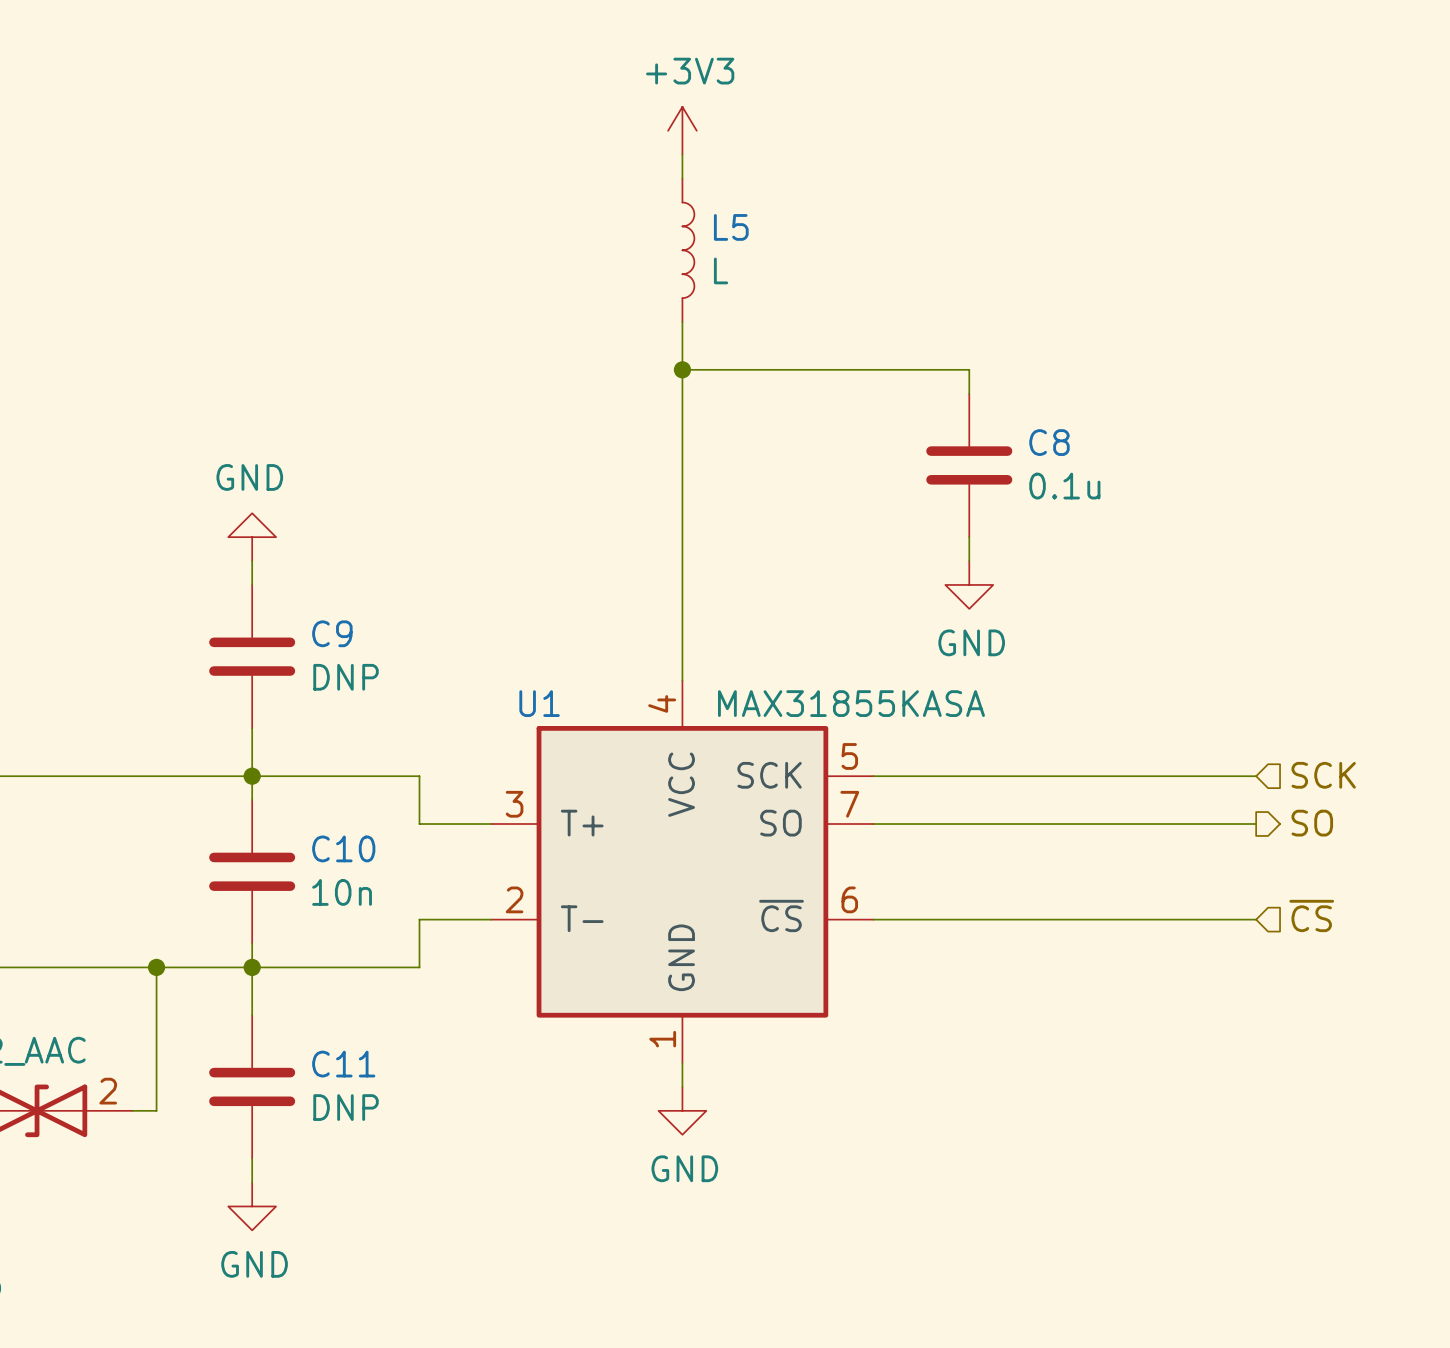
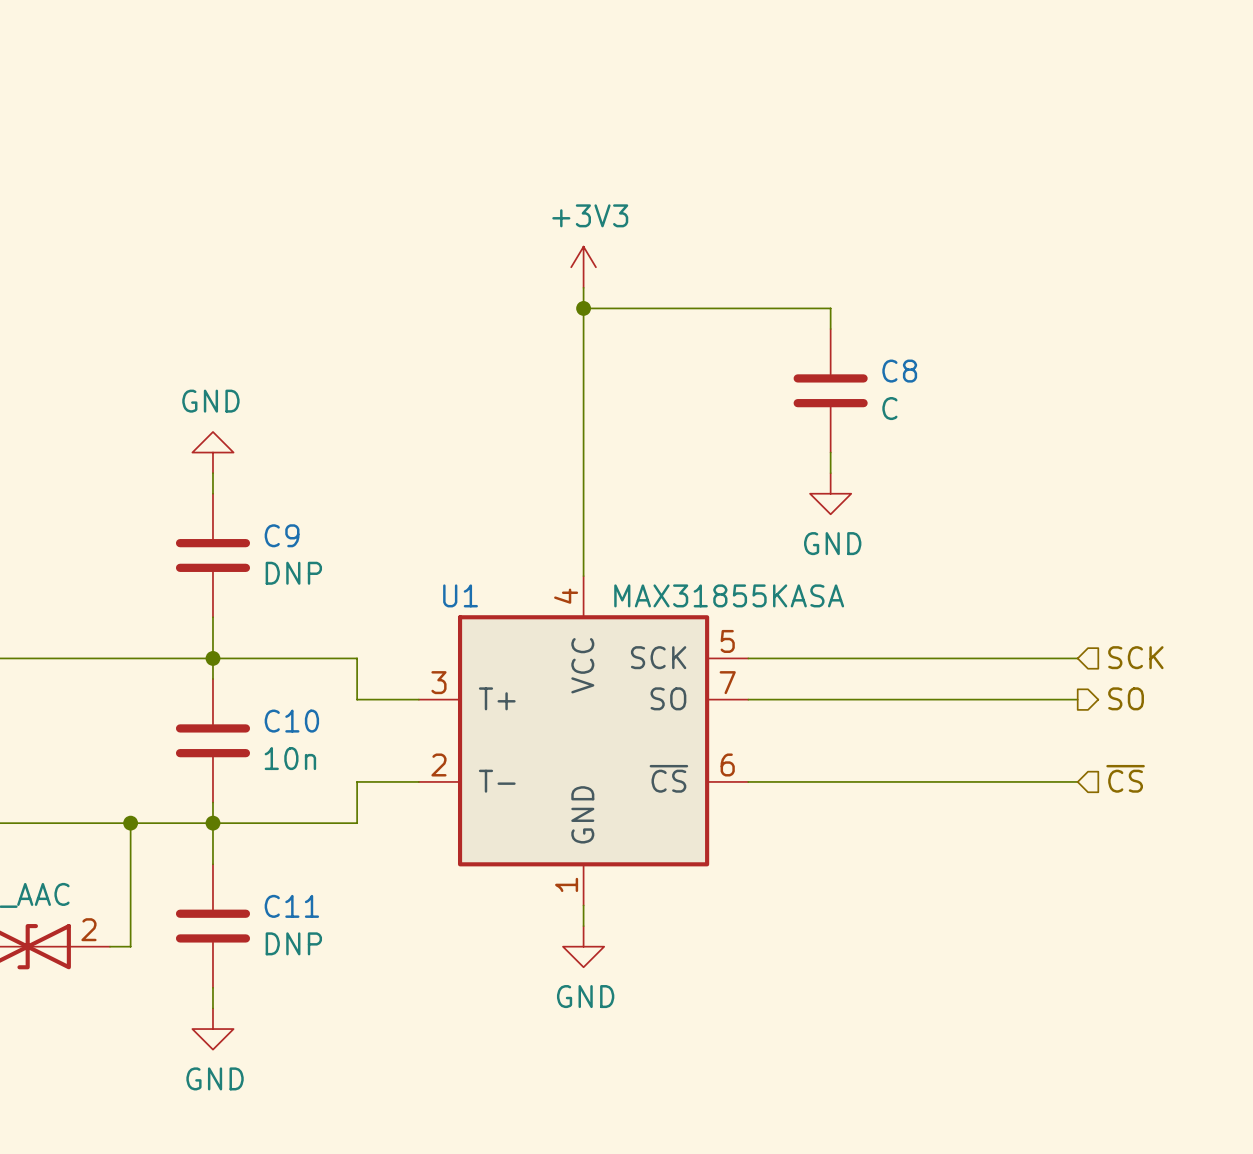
power symbol position: +3V3 (682, 130) -> +3V3 (583, 267)
wire: (682, 154) (682, 178) -> none
L5: L (688, 250) -> none
C8 value: 0.1u (1064, 486) -> C (889, 408)

